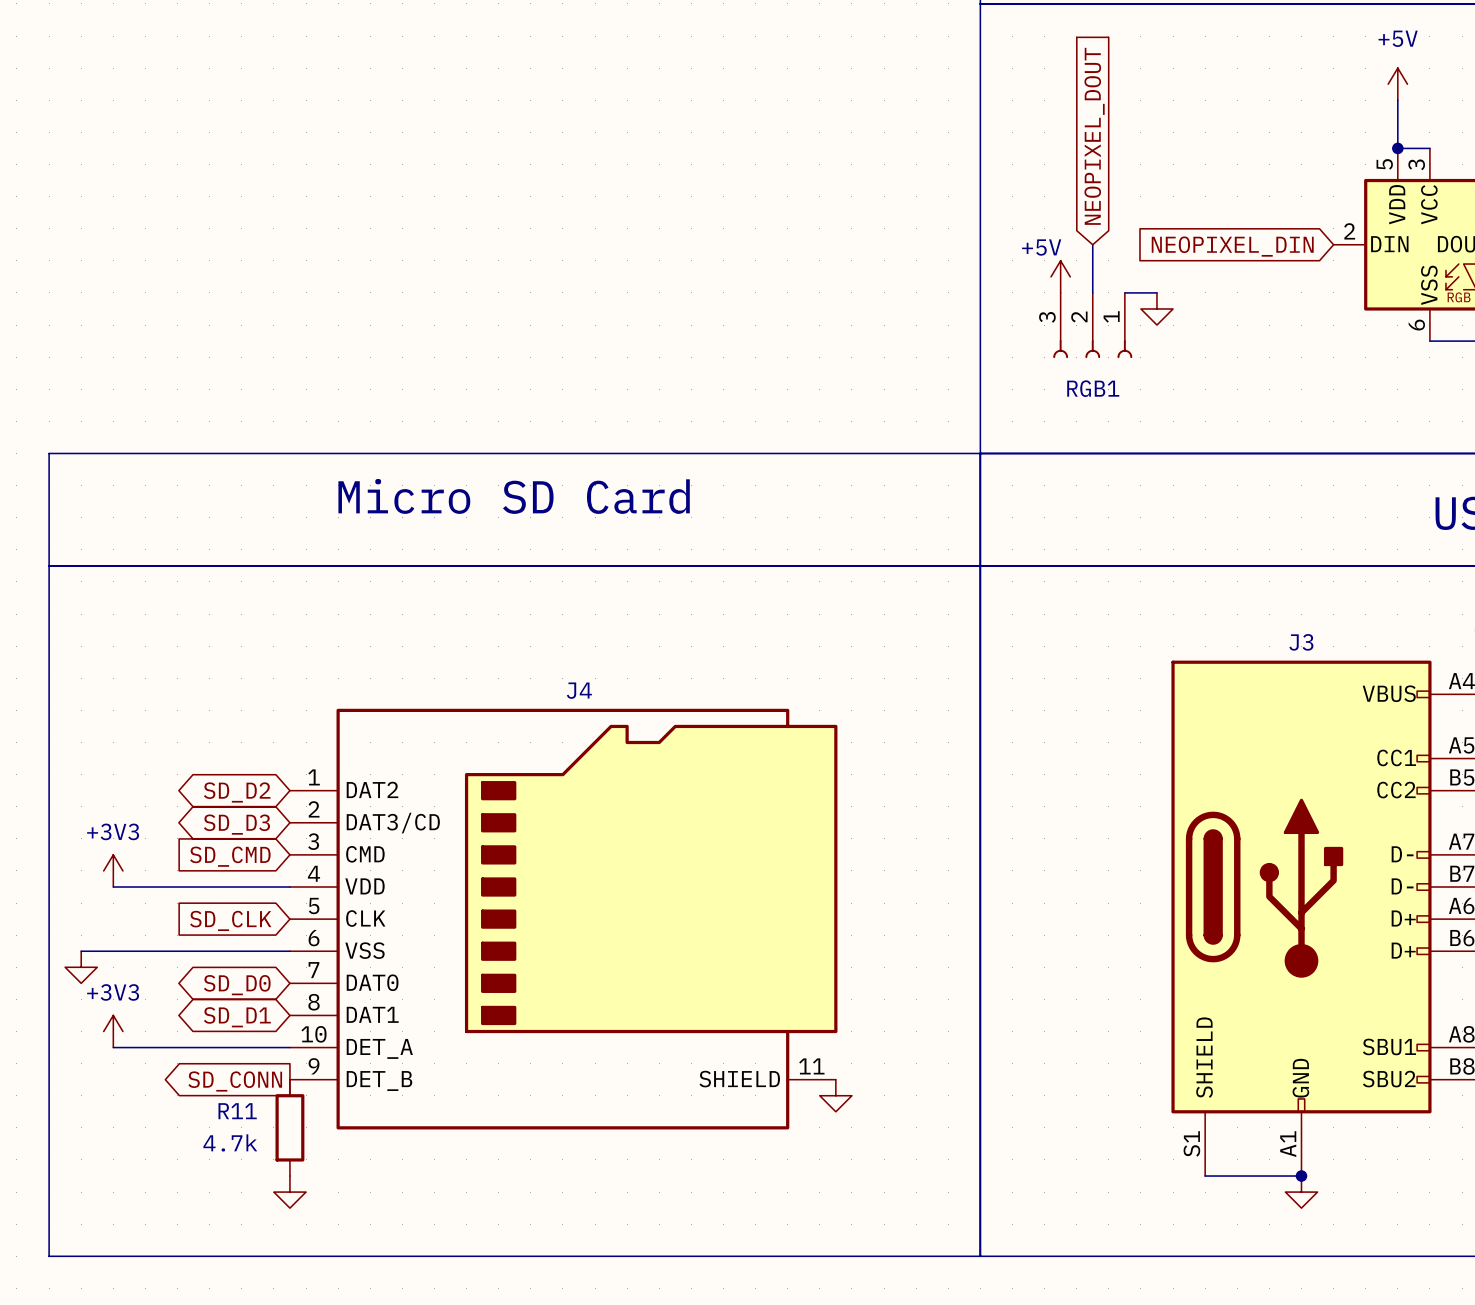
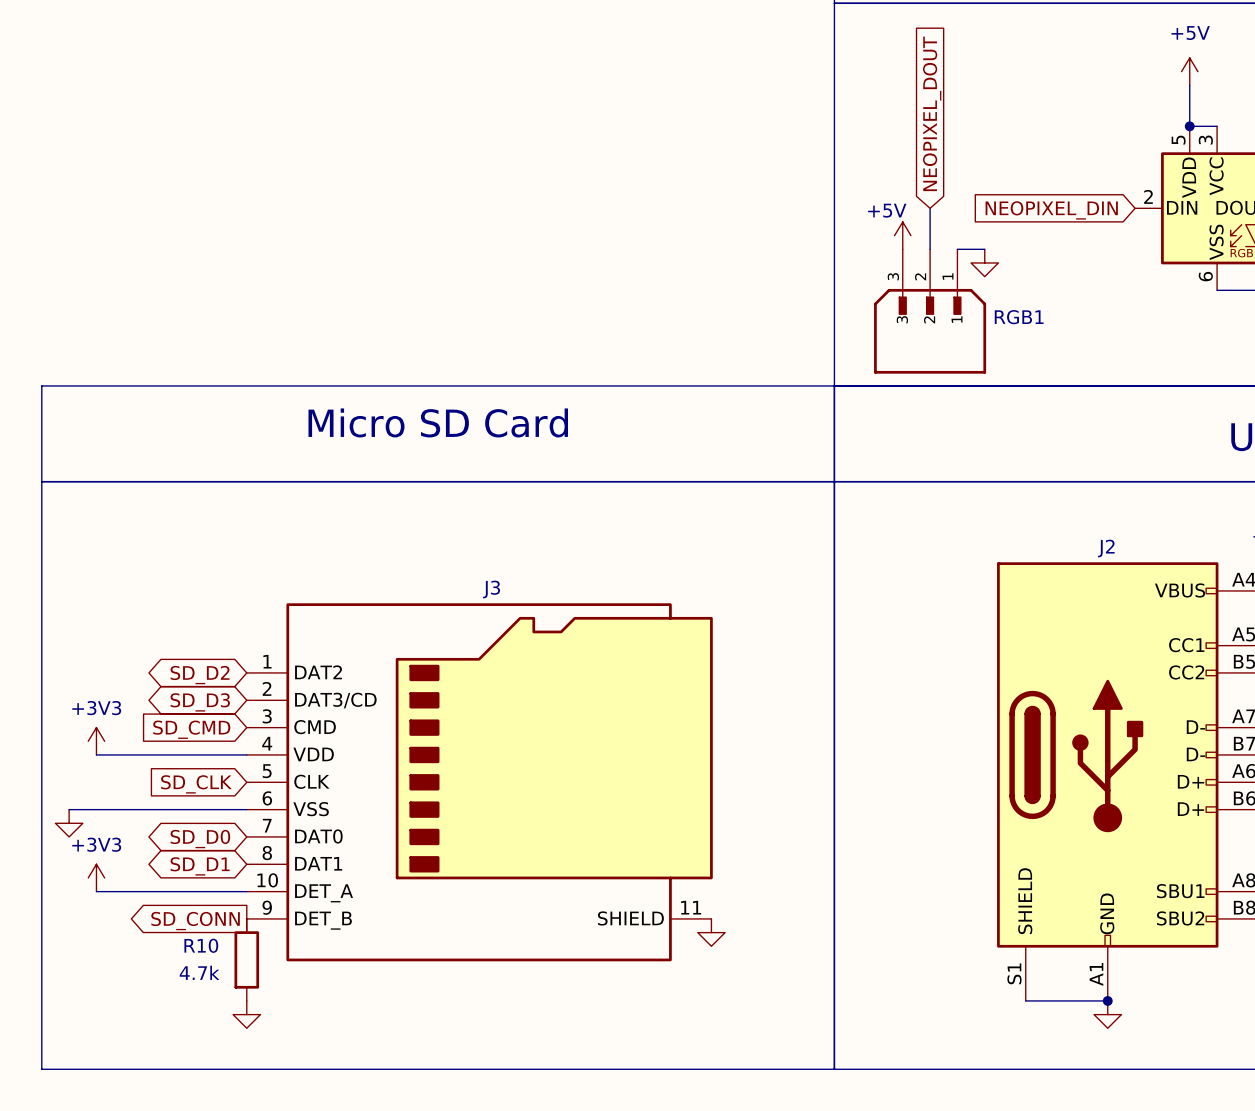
RGB1 symbol: [1053, 292, 1133, 359] -> [874, 249, 987, 374]
RGB1 name position: RGB1 (1093, 388) -> RGB1 (1019, 317)
J3 name: J3 (1301, 642) -> J2 (1106, 548)
J4 name: J4 (579, 690) -> J3 (491, 589)
R11 name: R11 (237, 1111) -> R10 (201, 945)

